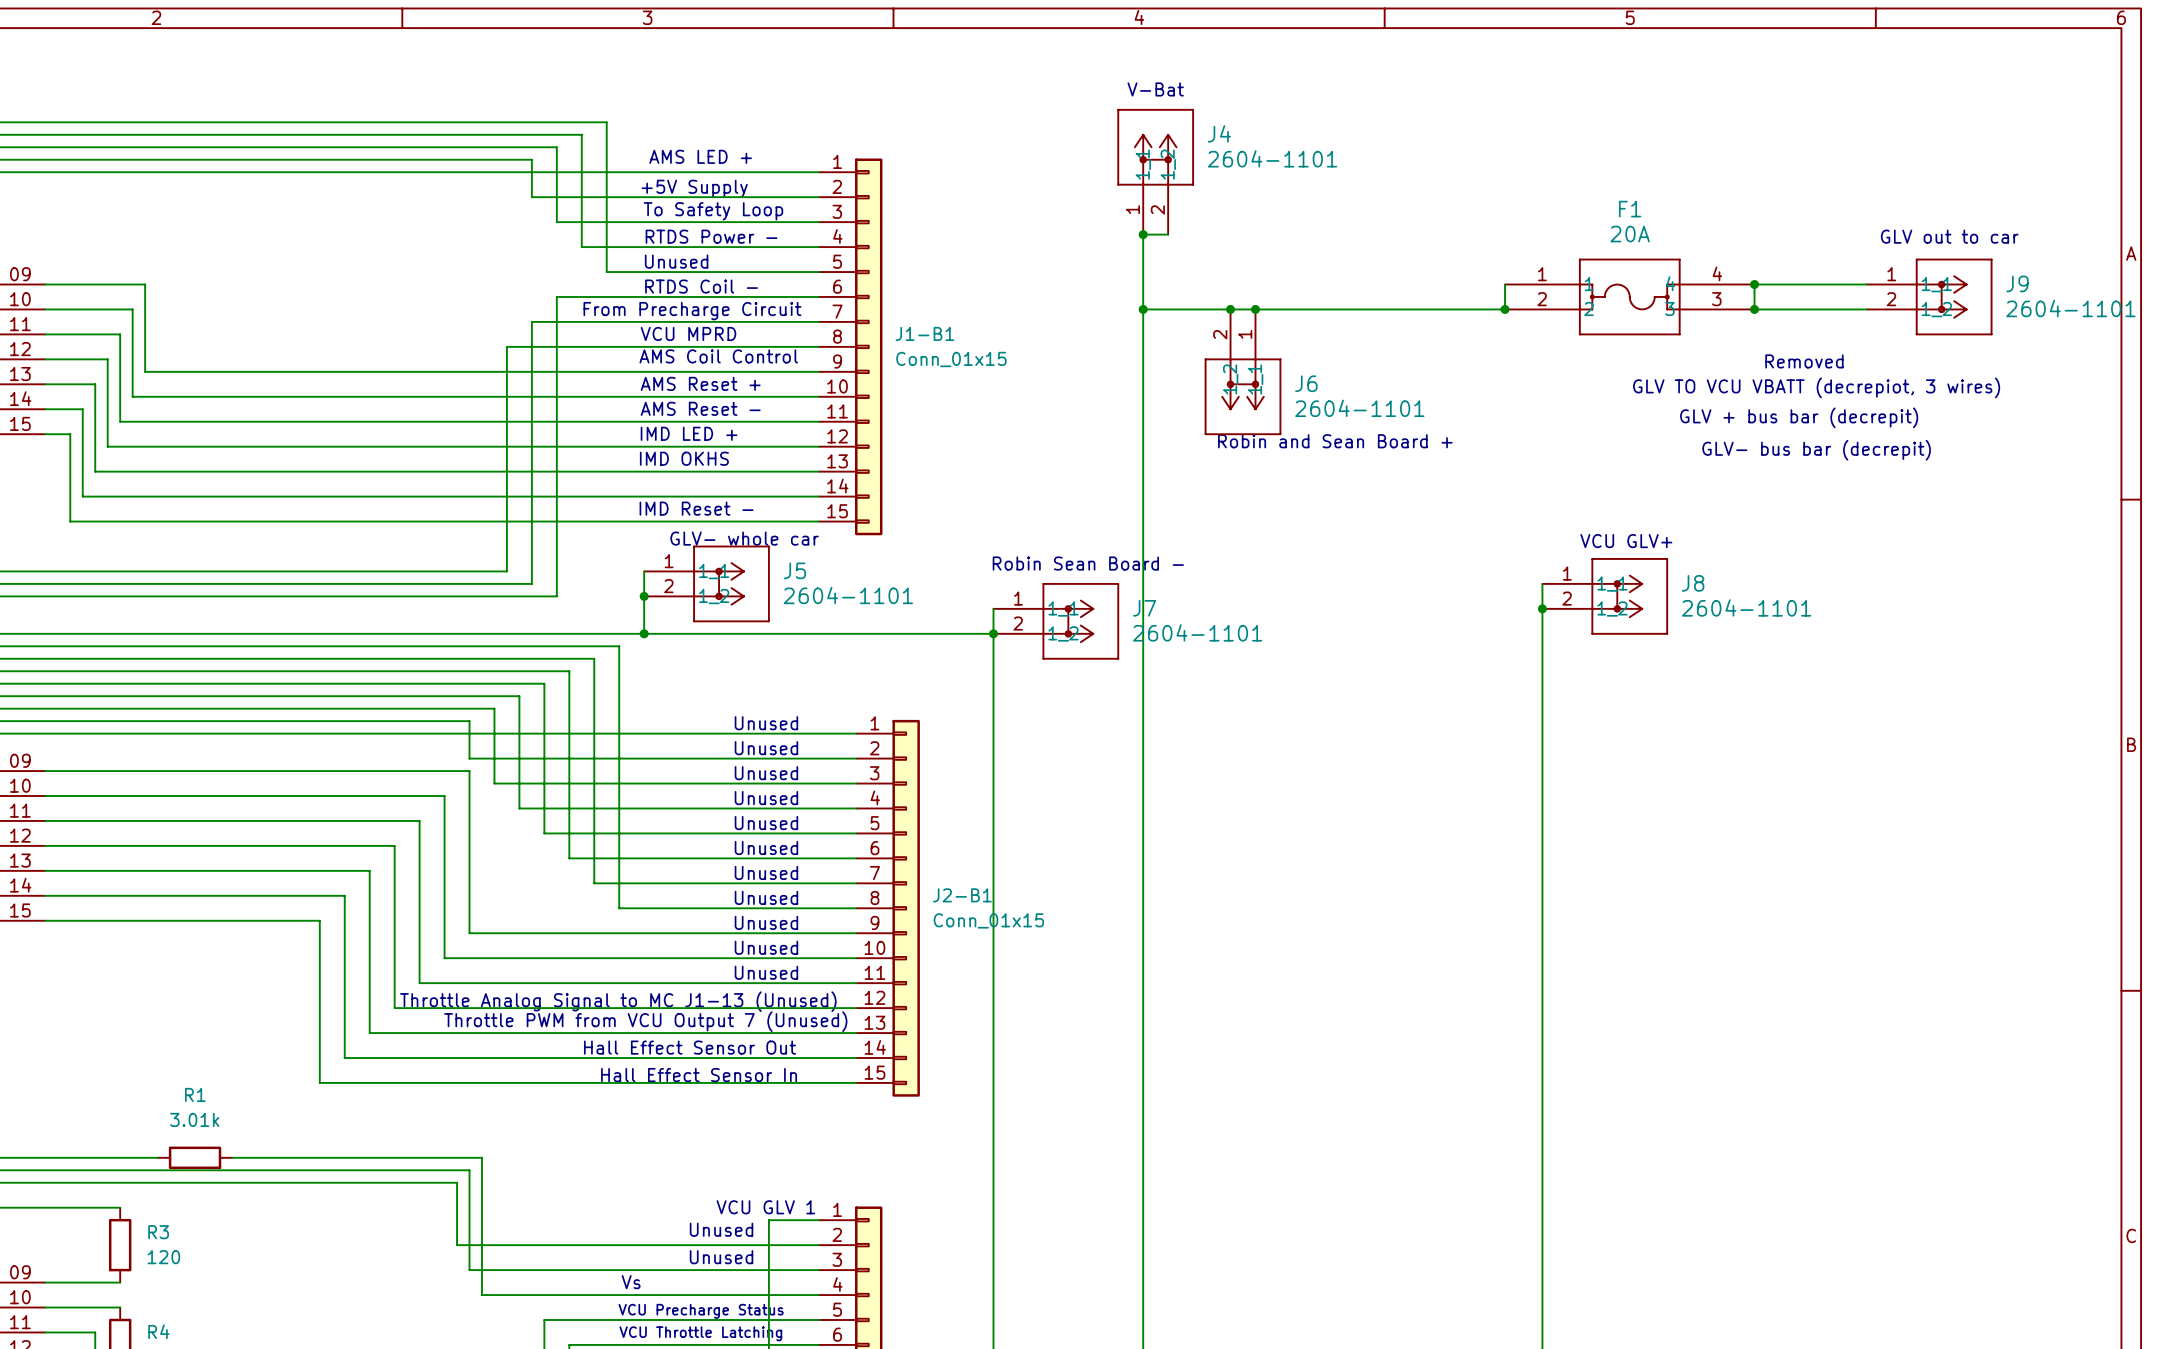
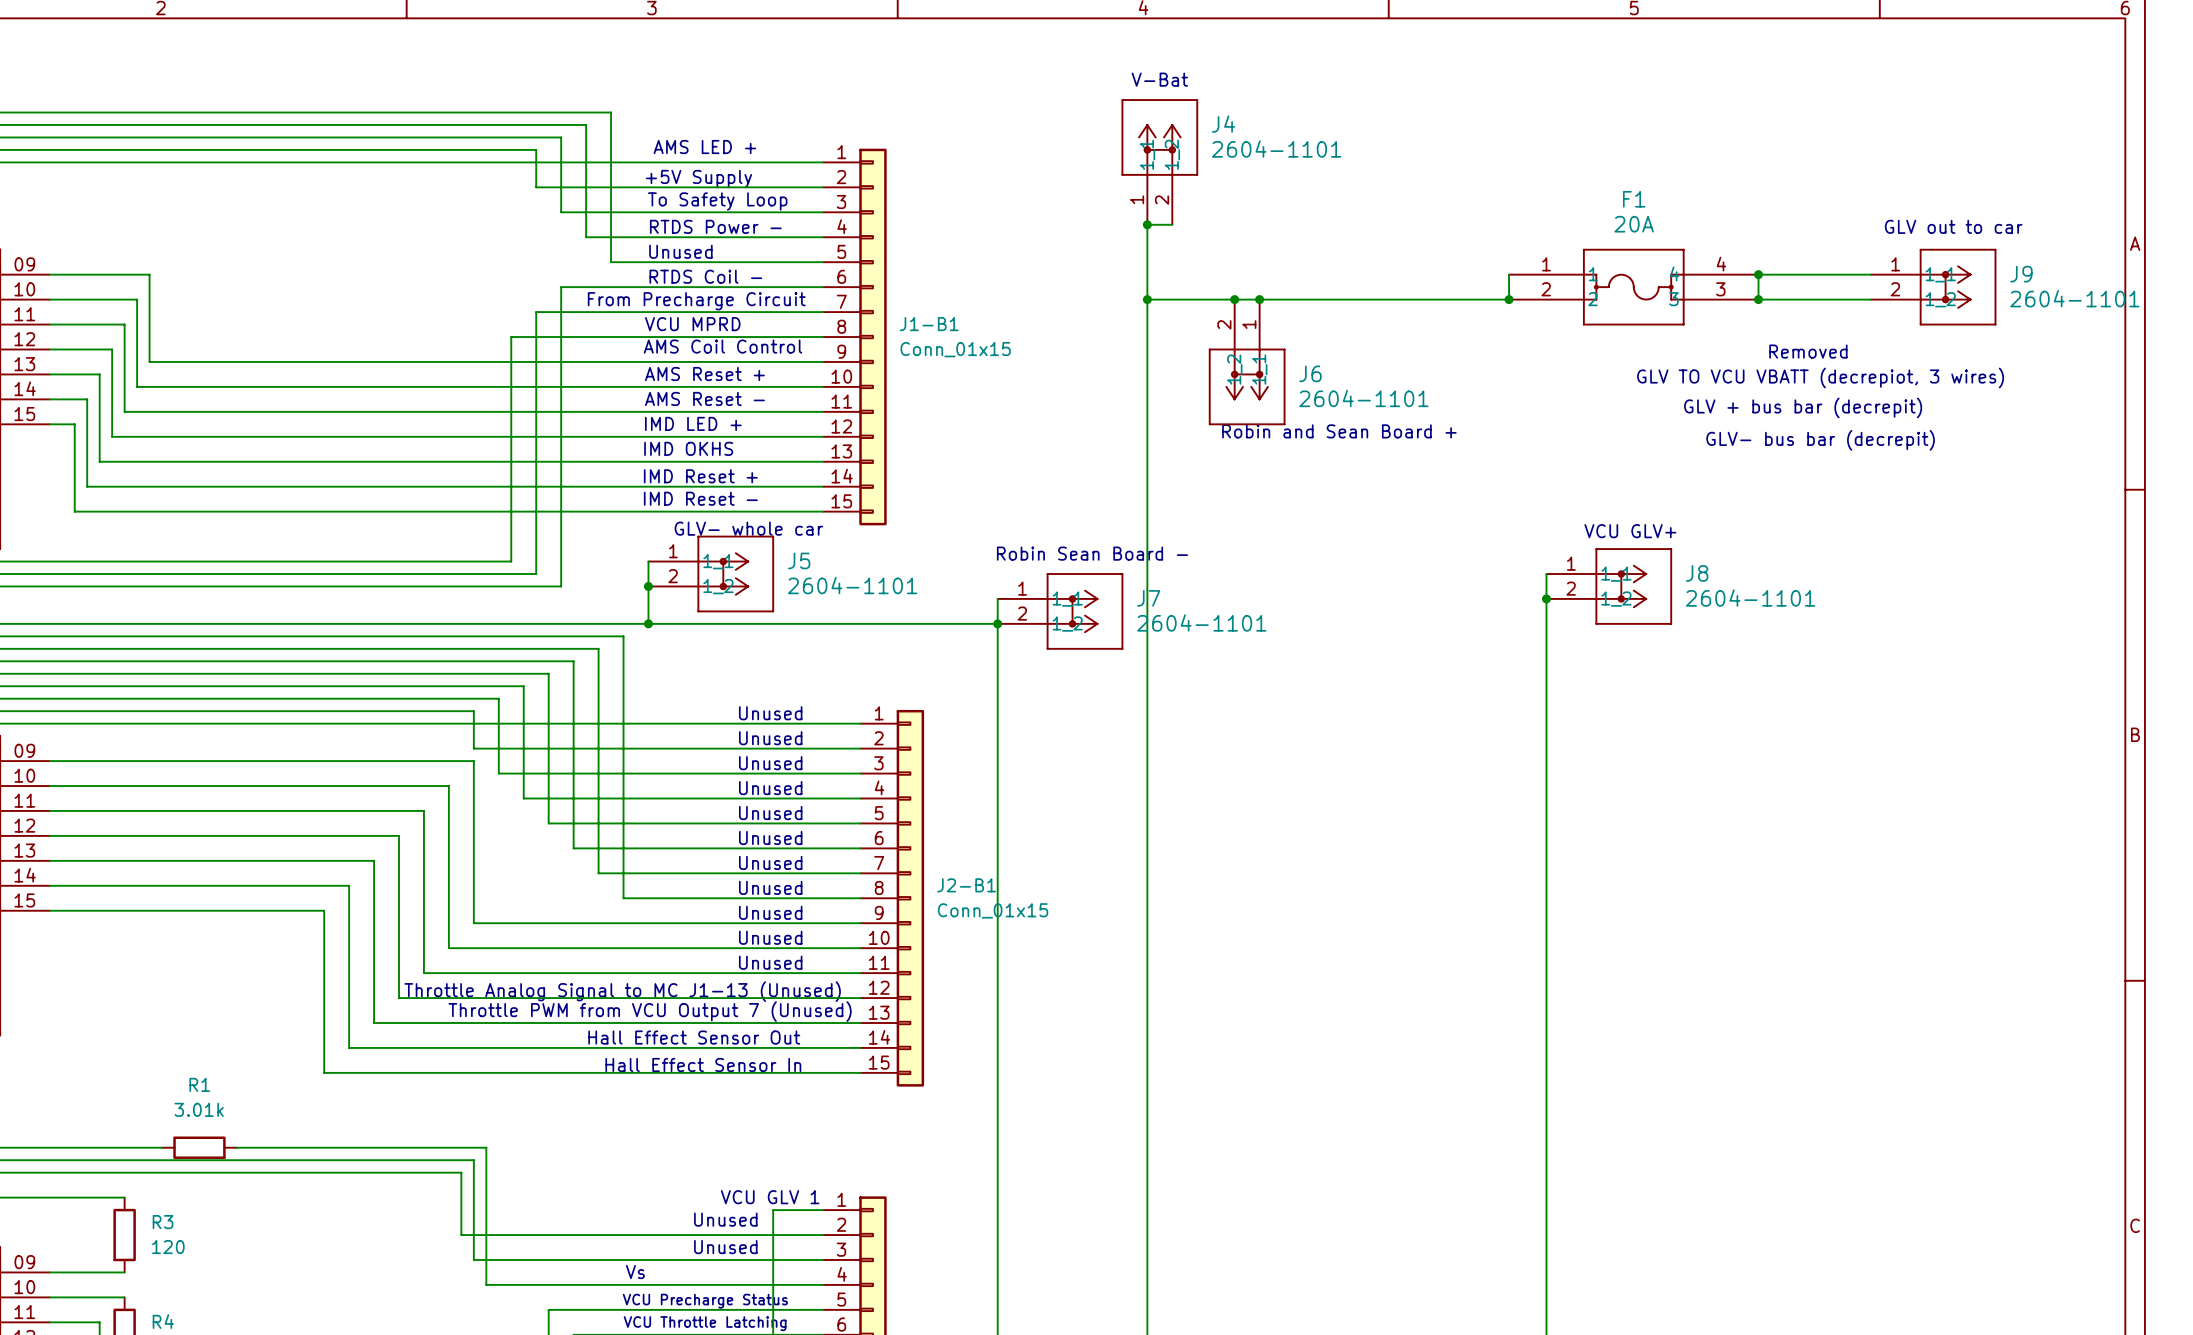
text: none -> IMD Reset + (700, 476)

